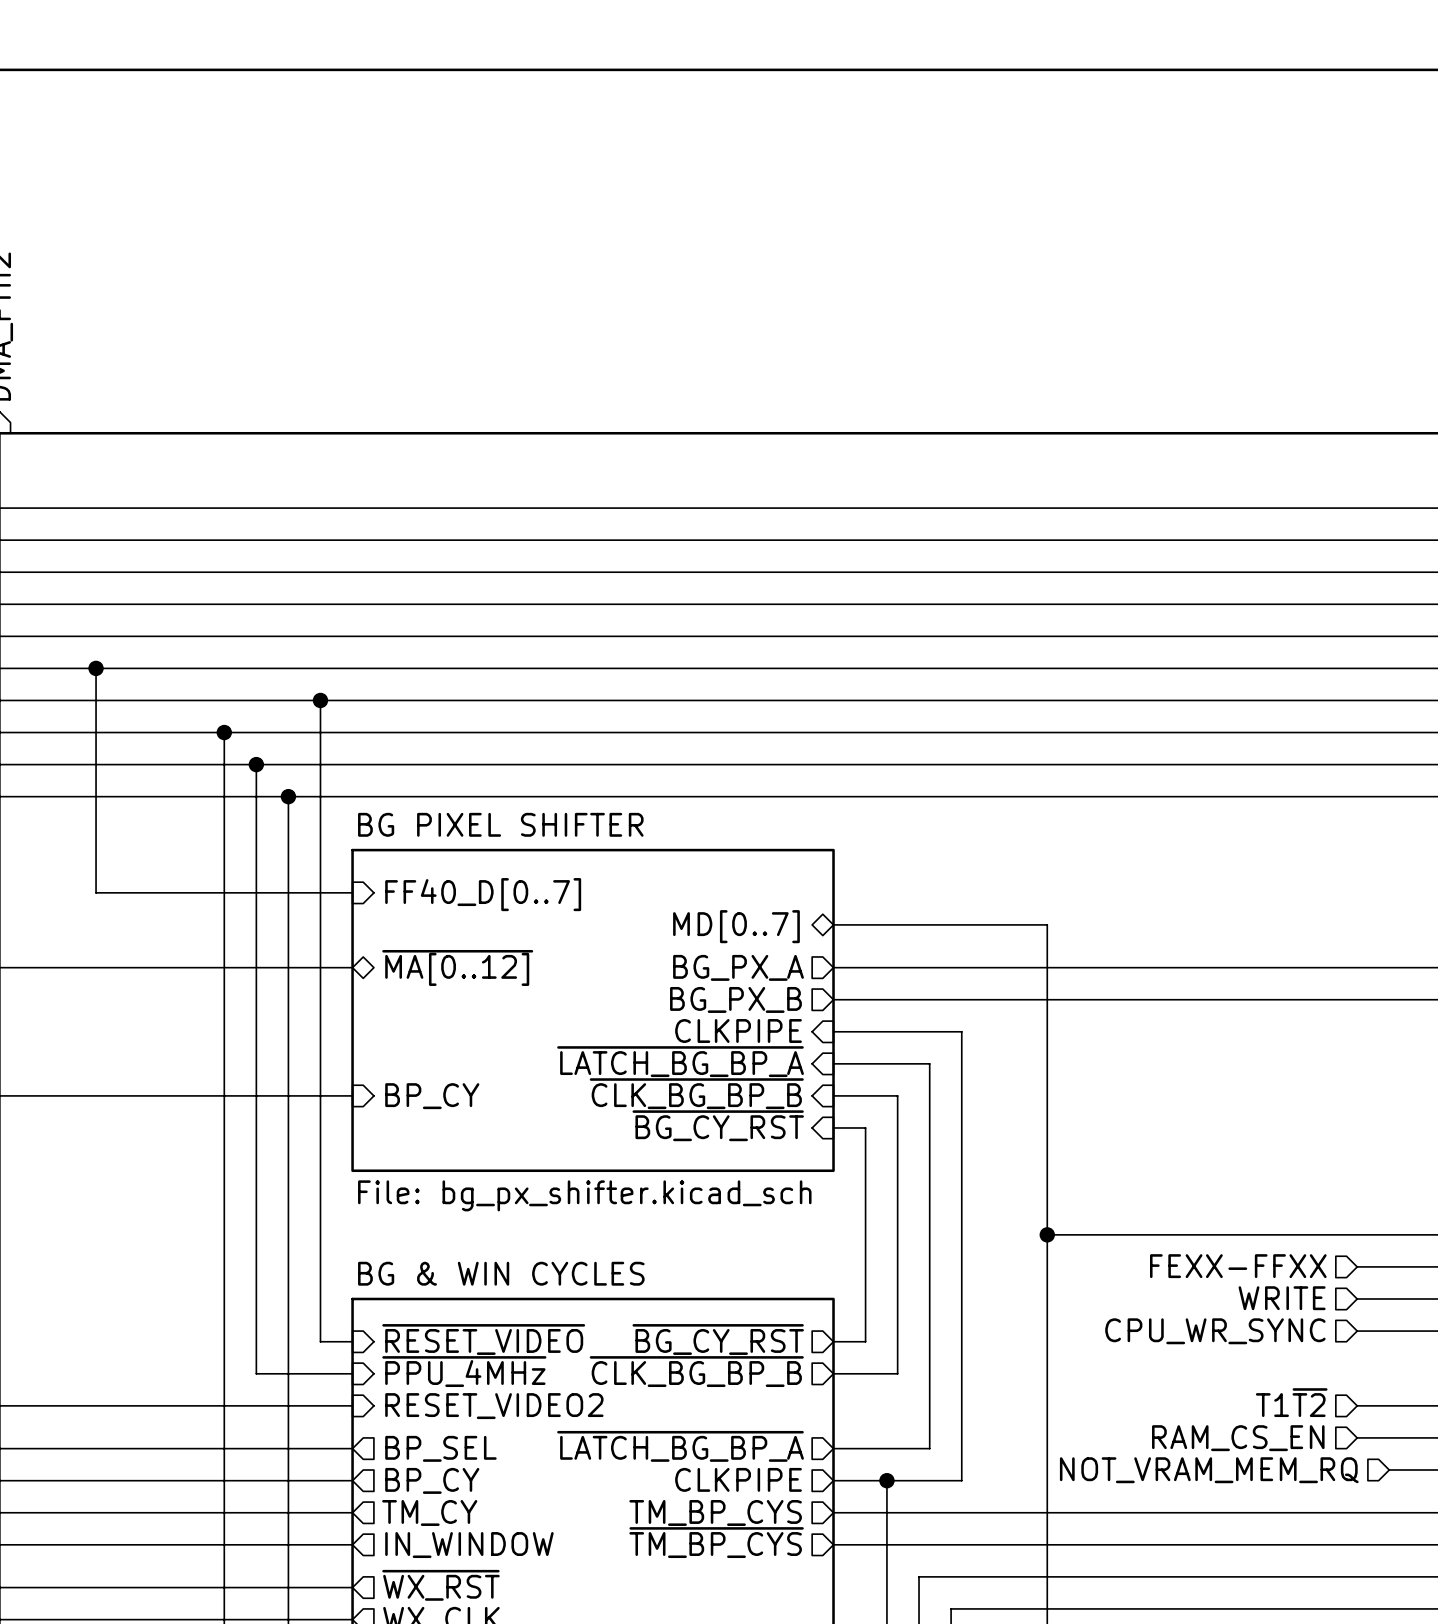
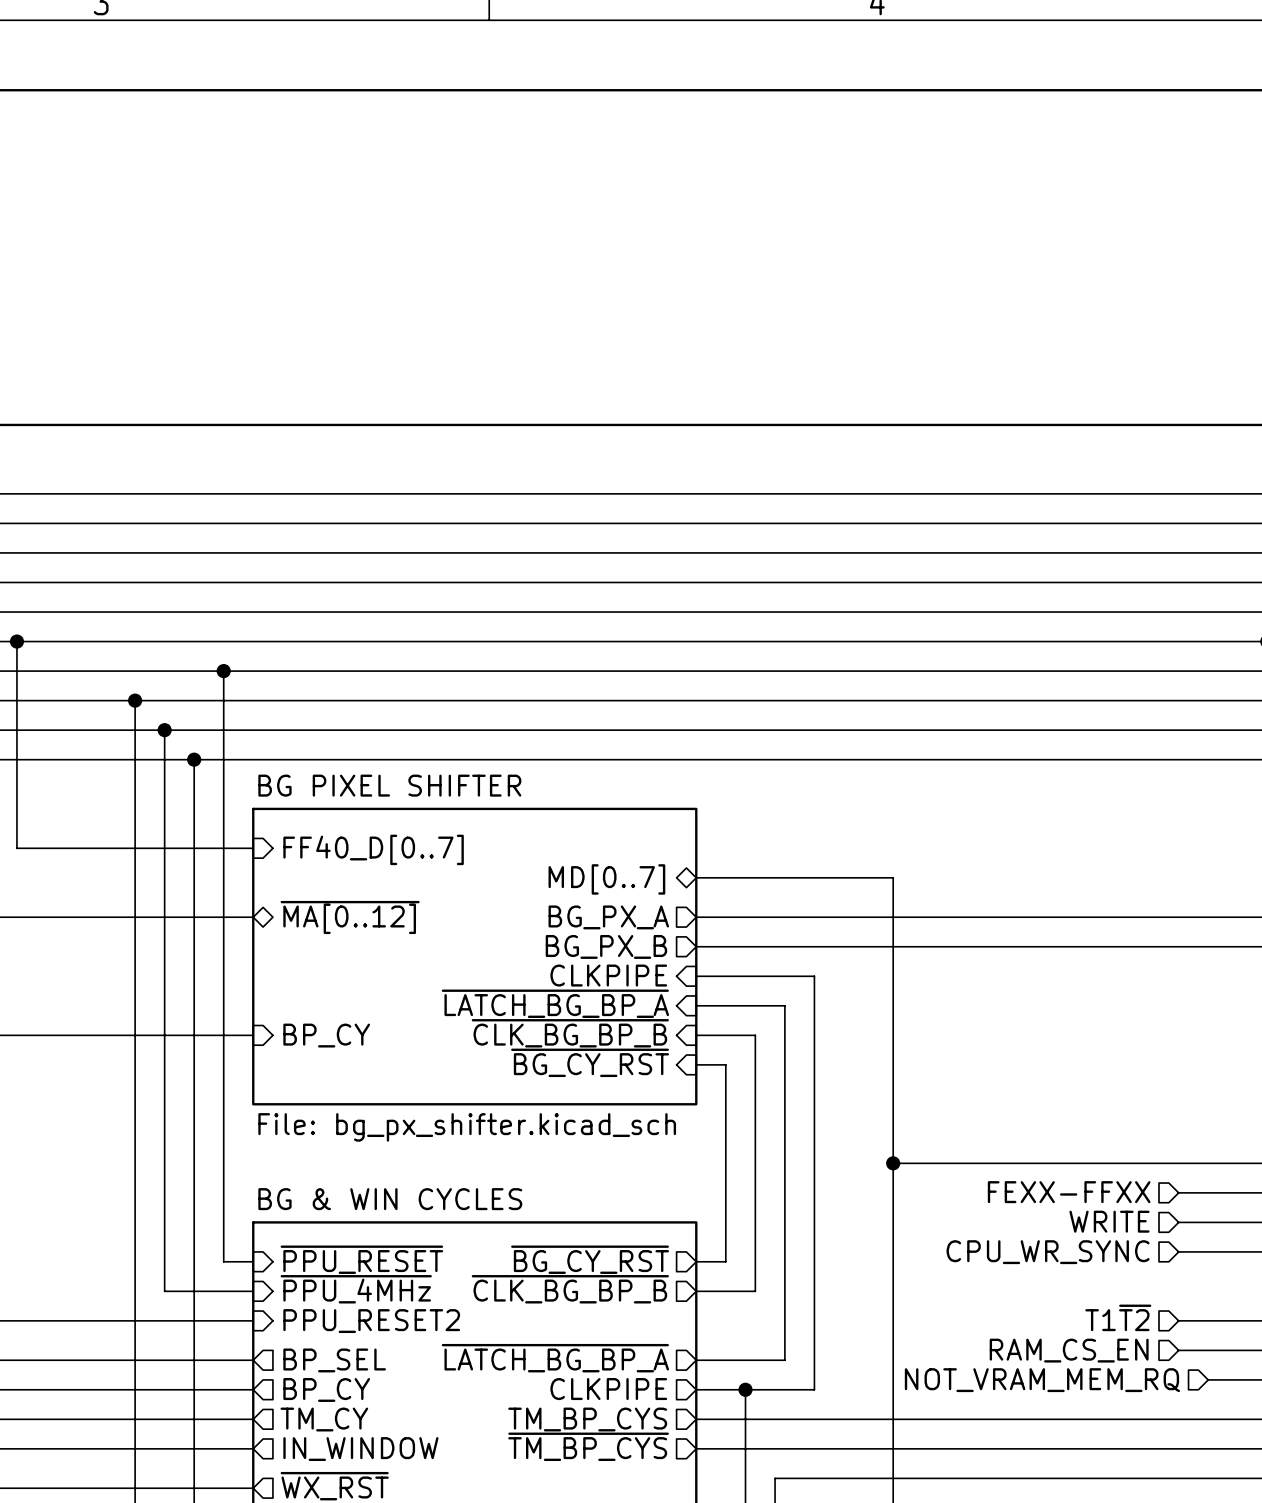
sheet pin: ~{RESET_VIDEO} (483, 1339) -> ~{PPU_RESET} (361, 1259)
sheet pin: RESET_VIDEO2 (494, 1406) -> PPU_RESET2 (371, 1321)

